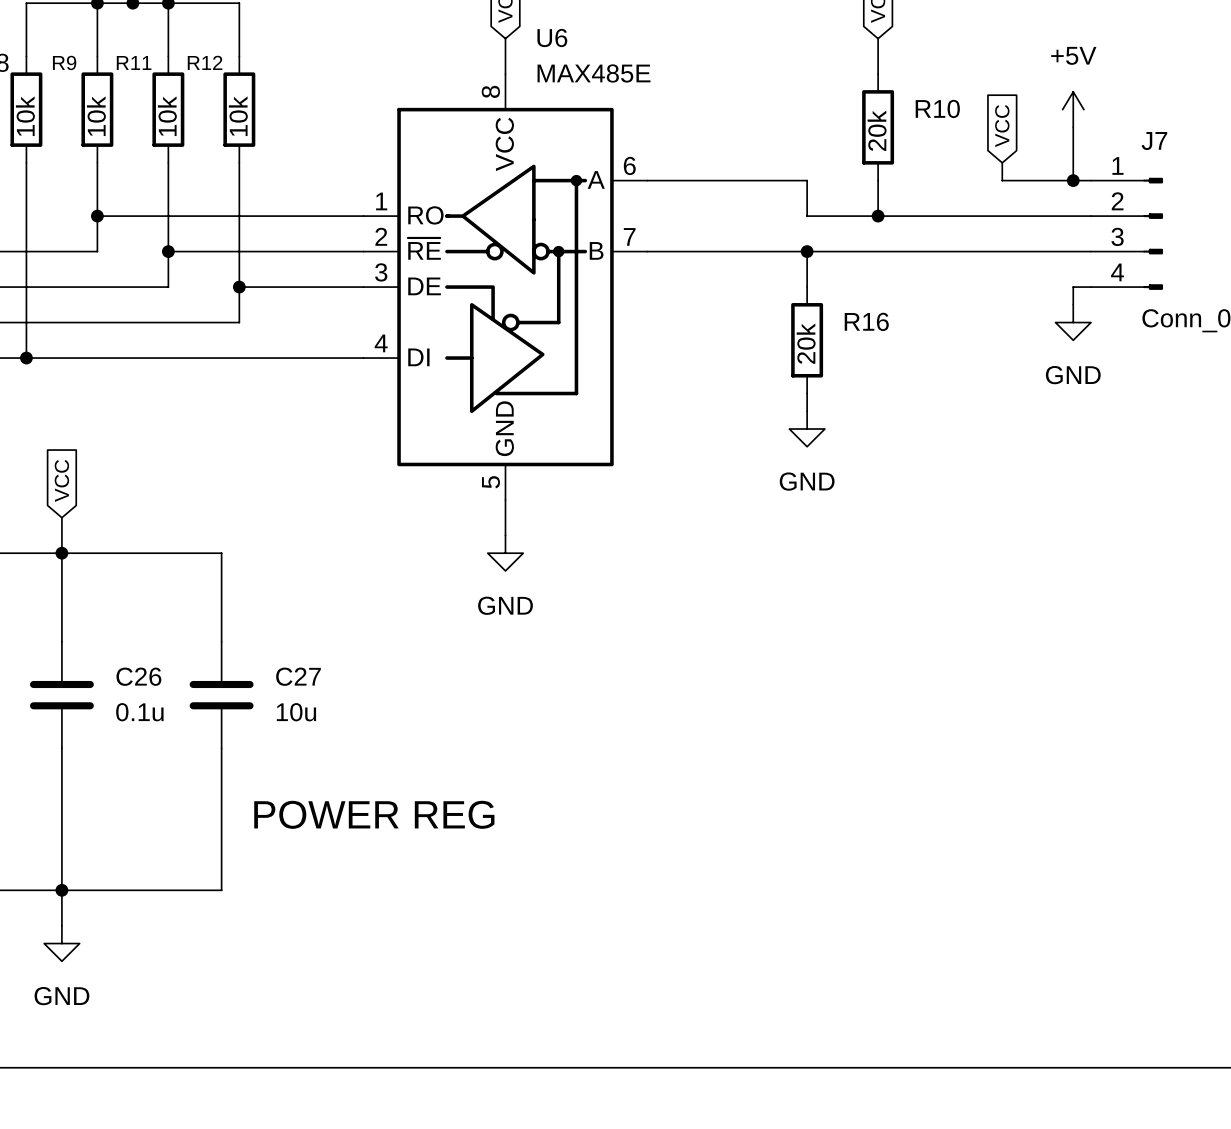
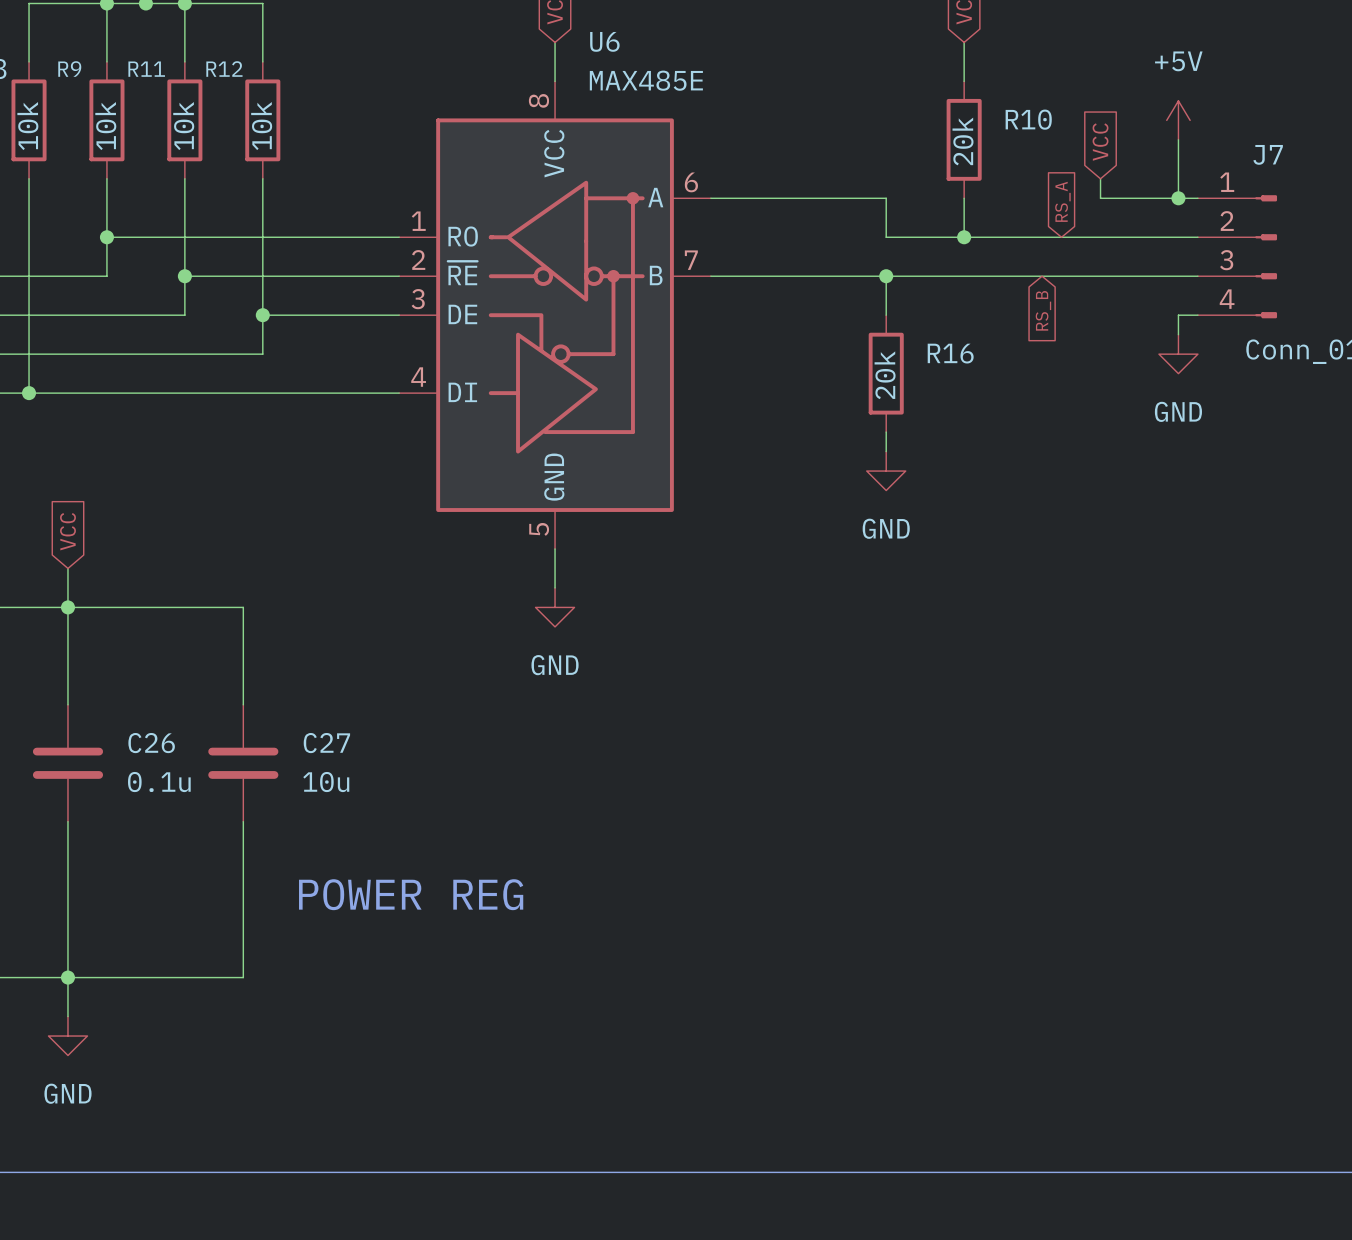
global label: none -> RS_A (1062, 201)
global label: none -> RS_B (1043, 310)

